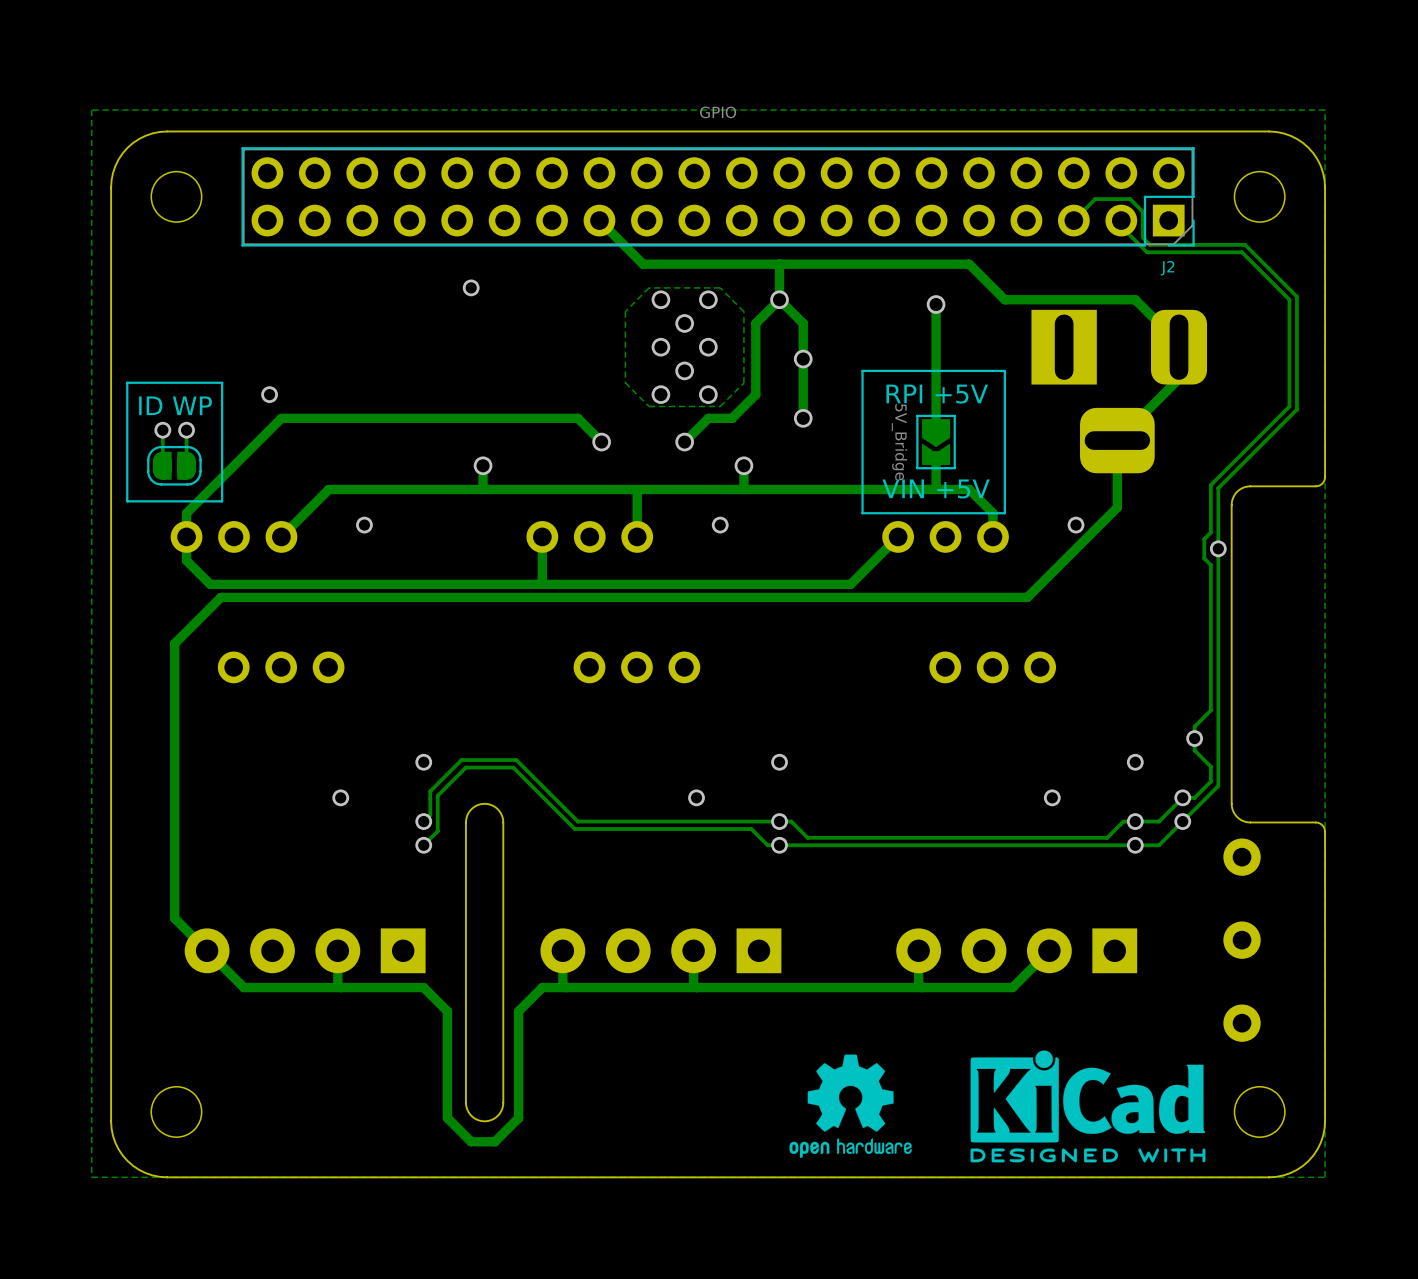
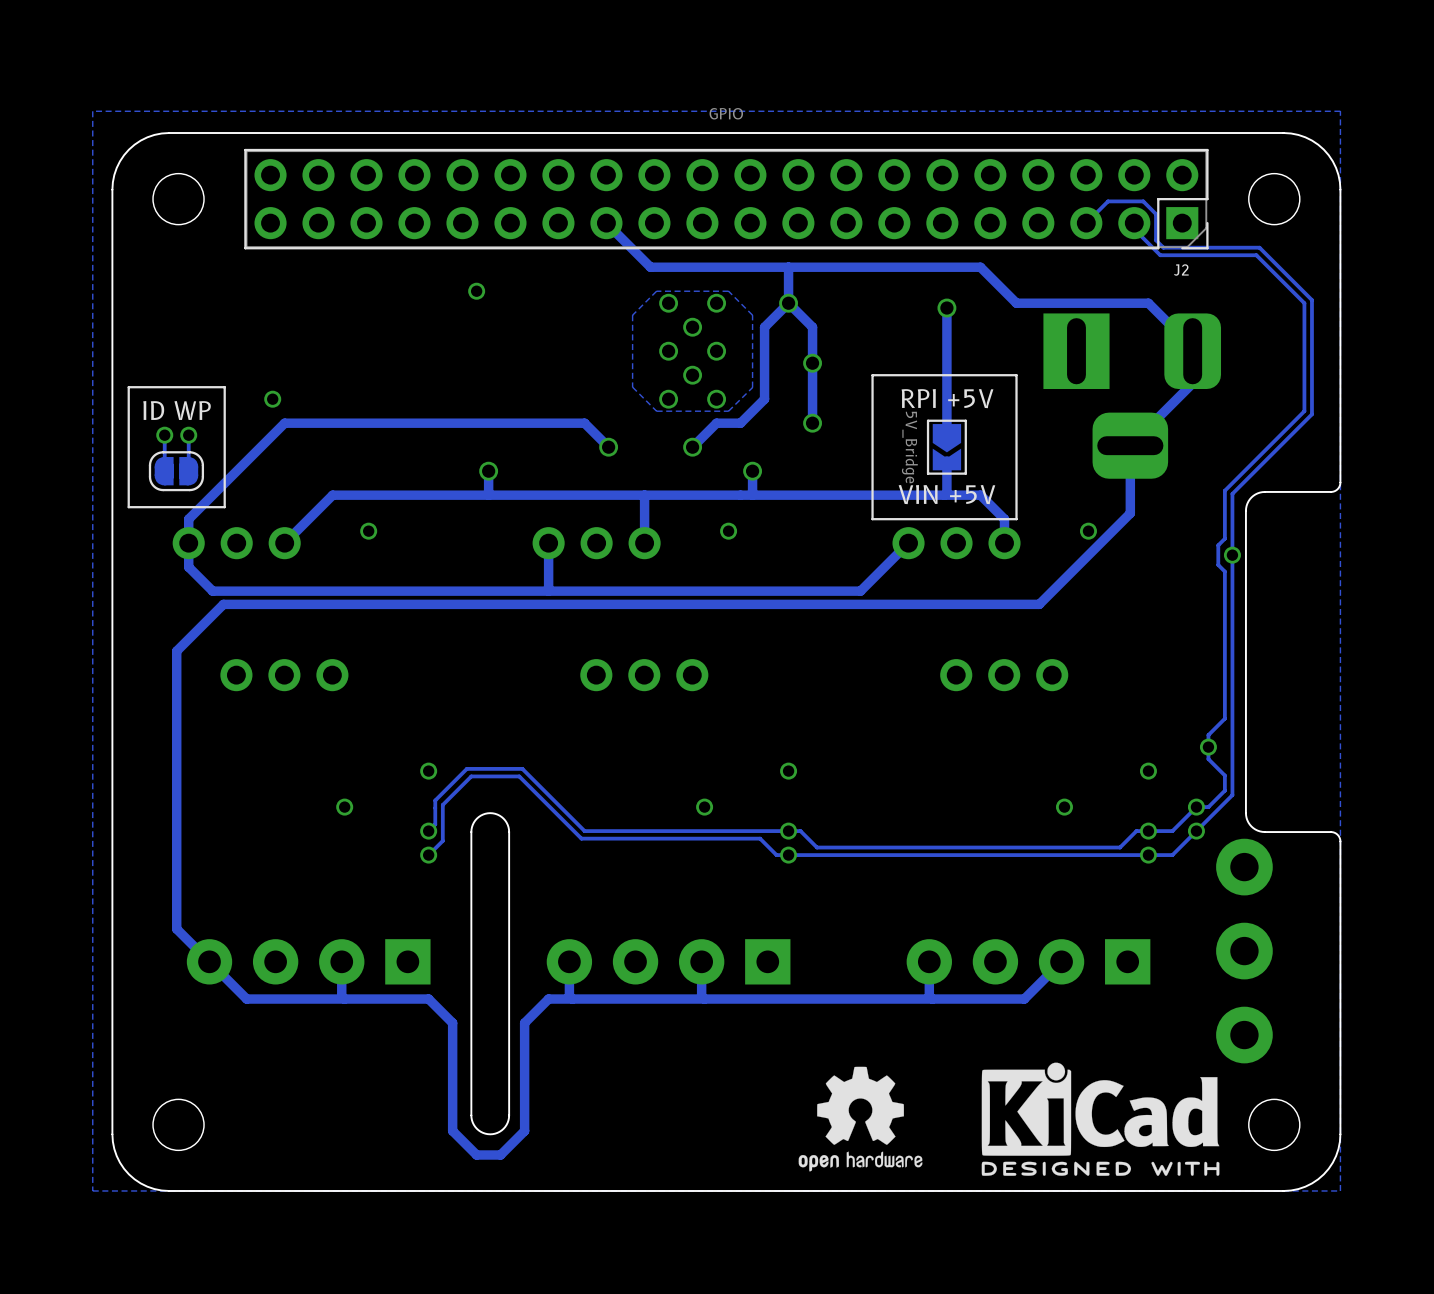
part footprint: [1223, 838, 1261, 876] -> [1216, 838, 1273, 896]
part footprint: [1223, 921, 1261, 959] -> [1216, 922, 1273, 980]
part footprint: [1223, 1004, 1261, 1042] -> [1216, 1006, 1273, 1064]

